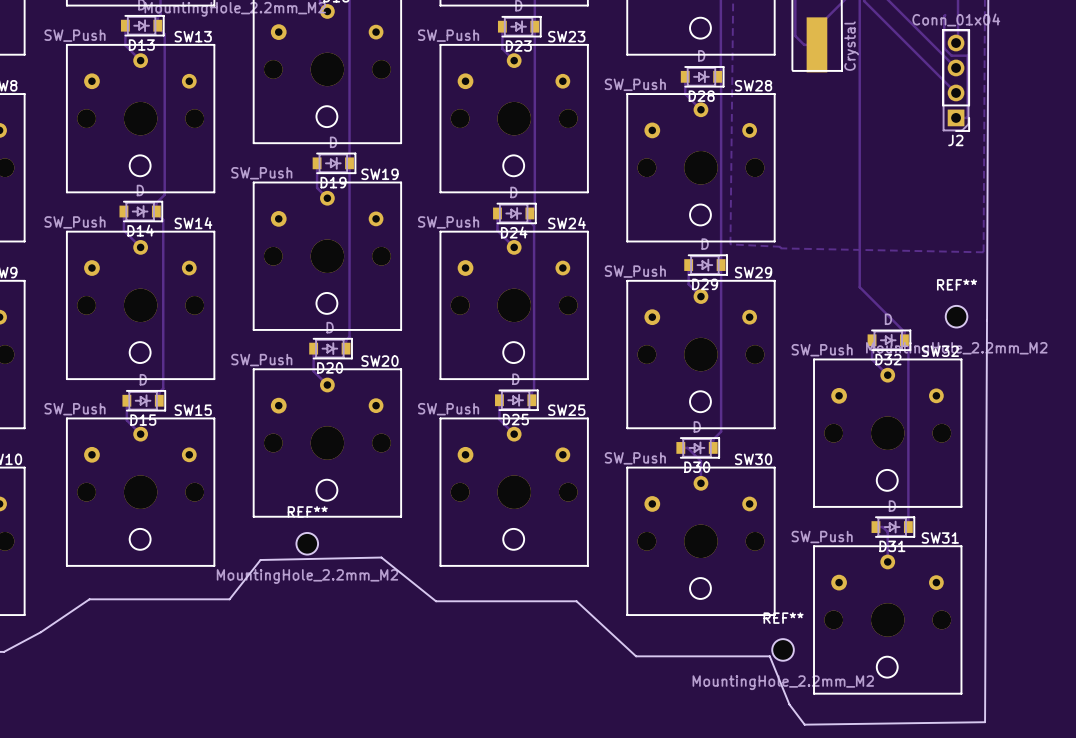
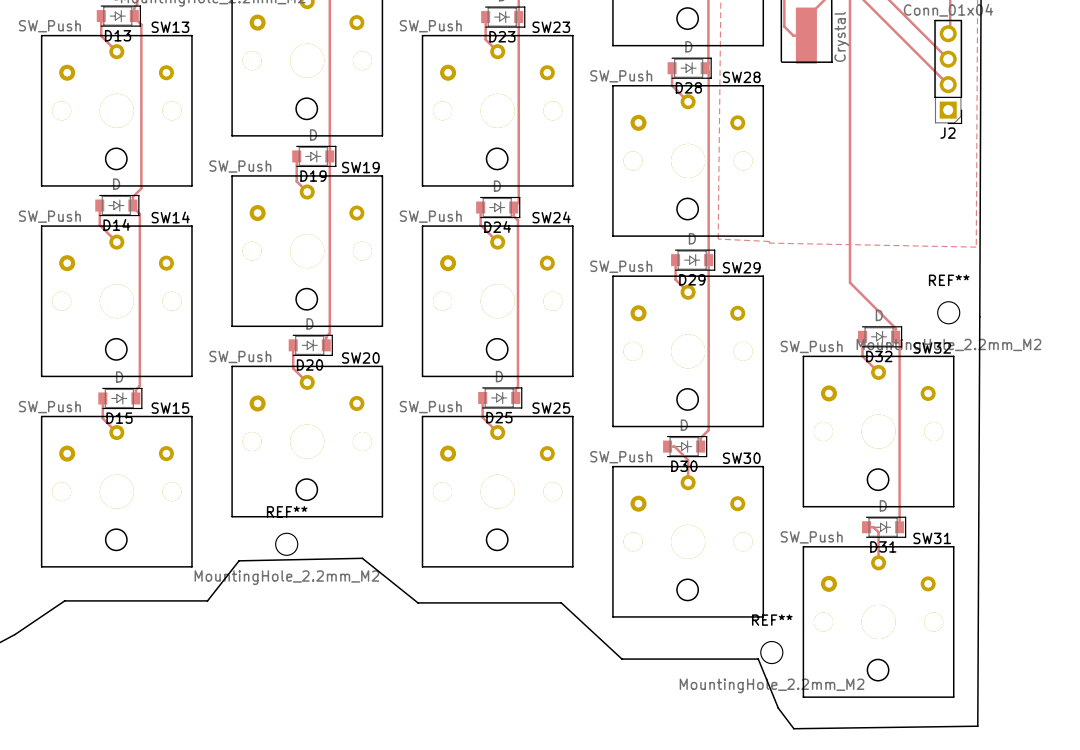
track: (945, 15) (944, 48) (951, 55) (967, 55) (967, 117) (956, 117) -> none

